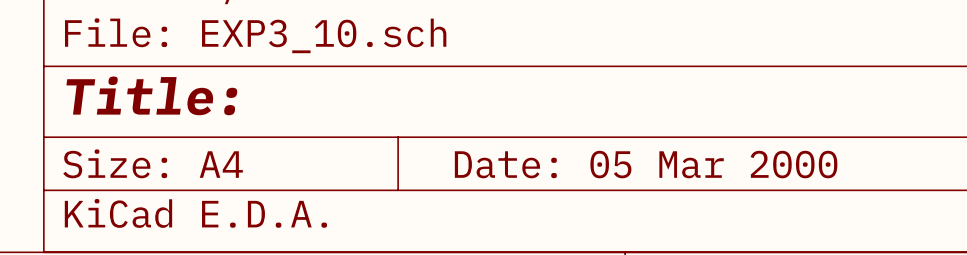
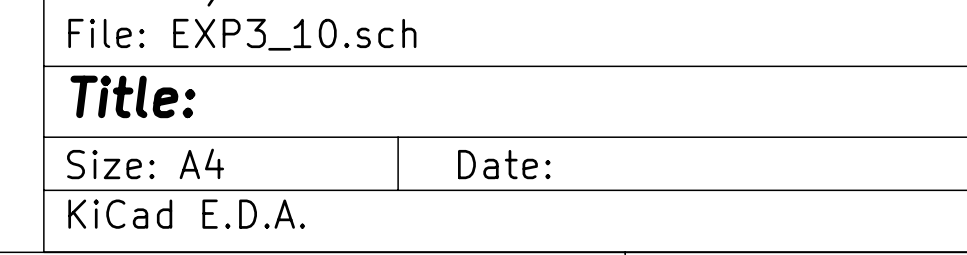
title block: Date: 05 Mar 2000 (646, 164) -> Date: (504, 164)

